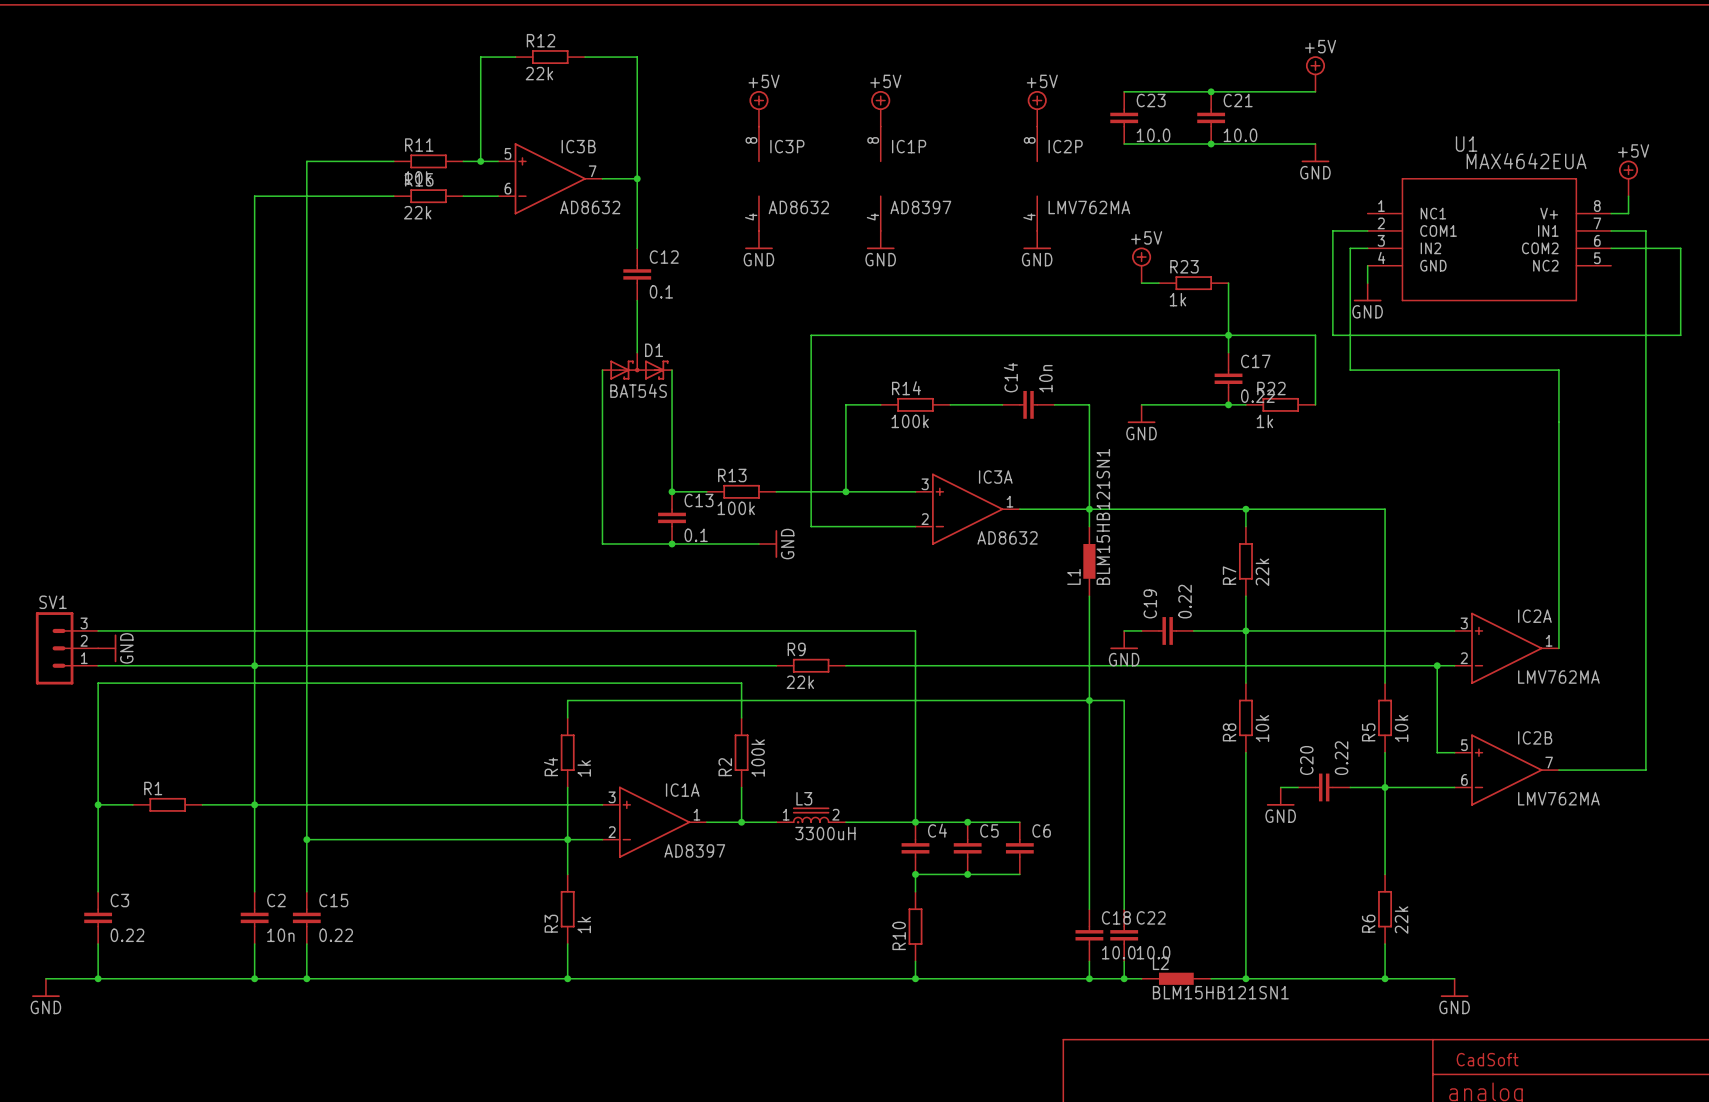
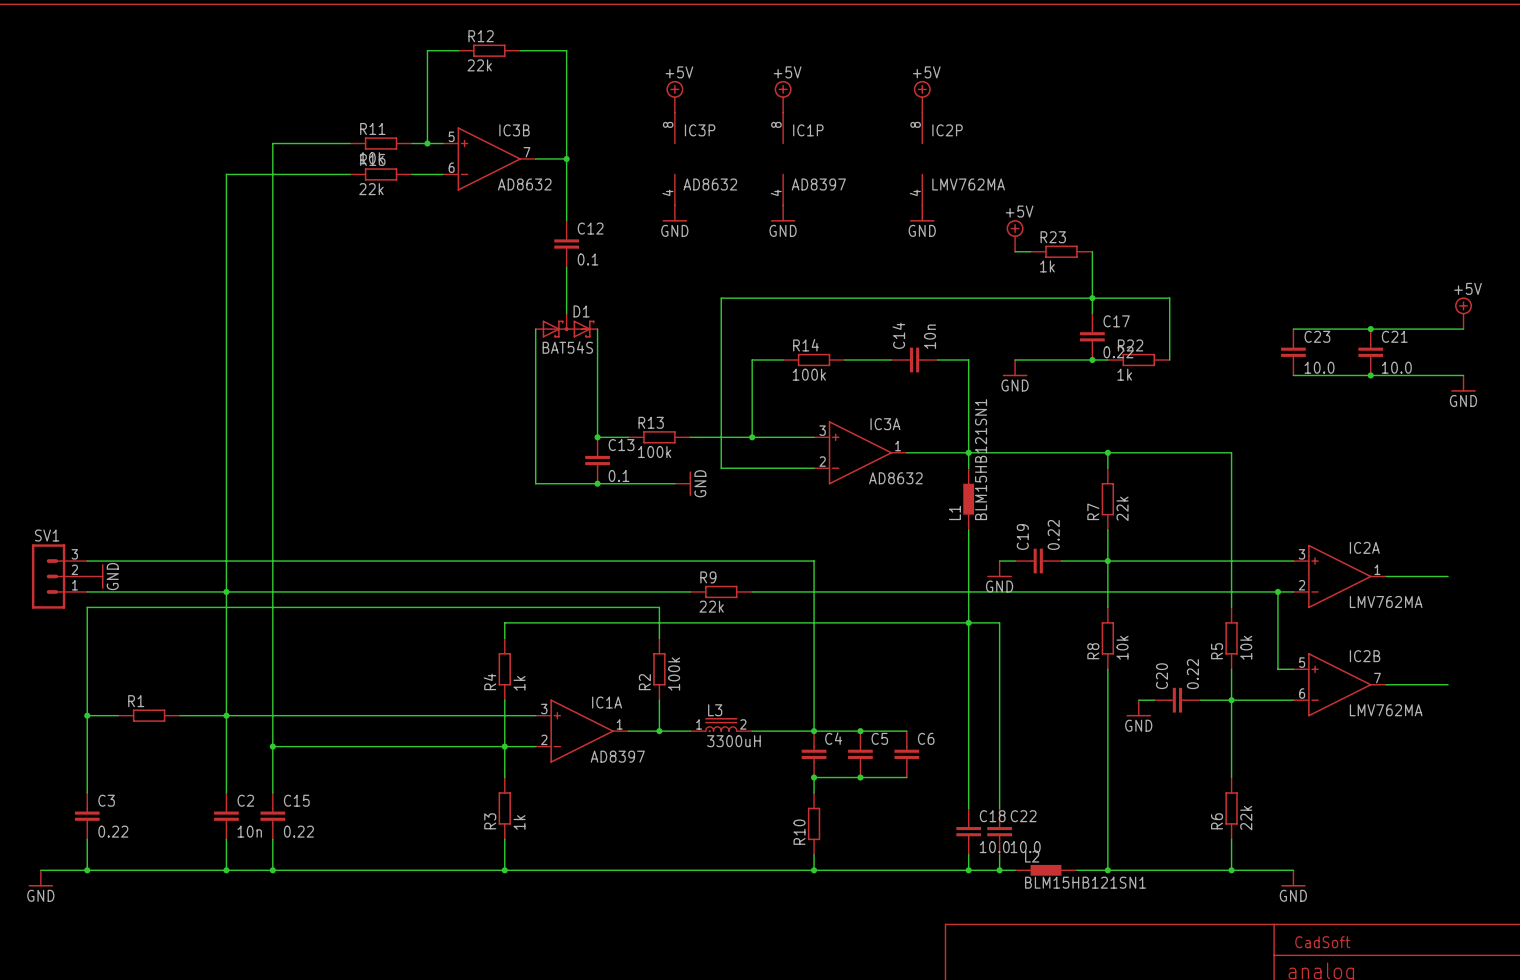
power symbol: +5V (1315, 74) -> none
wire: (1124, 91) (1315, 91) -> none
junction: (1211, 91) -> none
C23 position: (1124, 117) -> (1293, 352)
C21 position: (1211, 117) -> (1370, 352)
wire: (1124, 144) (1315, 144) -> none
junction: (1211, 144) -> none
power symbol: GND (1315, 153) -> none
power symbol: +5V (1628, 178) -> none
wire: (1628, 196) (1628, 213) (1611, 213) -> none
wire: (1367, 230) (1332, 230) (1332, 335) (1680, 335) (1680, 248) (1611, 248) -> none
wire: (1611, 230) (1645, 230) (1645, 770) (1628, 770) -> none
U1: MAX4642EUA (1489, 239) -> none
wire: (1367, 248) (1350, 248) (1350, 370) (1454, 370) -> none
wire: (1367, 265) (1367, 283) -> none
power symbol: GND (1367, 292) -> none
power symbol: none -> +5V (1463, 313)
junction: none -> (1370, 329)
wire: (1558, 370) (1558, 648) -> (1448, 576) (1386, 576)
wire: none -> (1386, 329) (1463, 329)
wire: none -> (1293, 375) (1463, 375)
junction: none -> (1370, 375)
power symbol: none -> GND (1463, 383)

